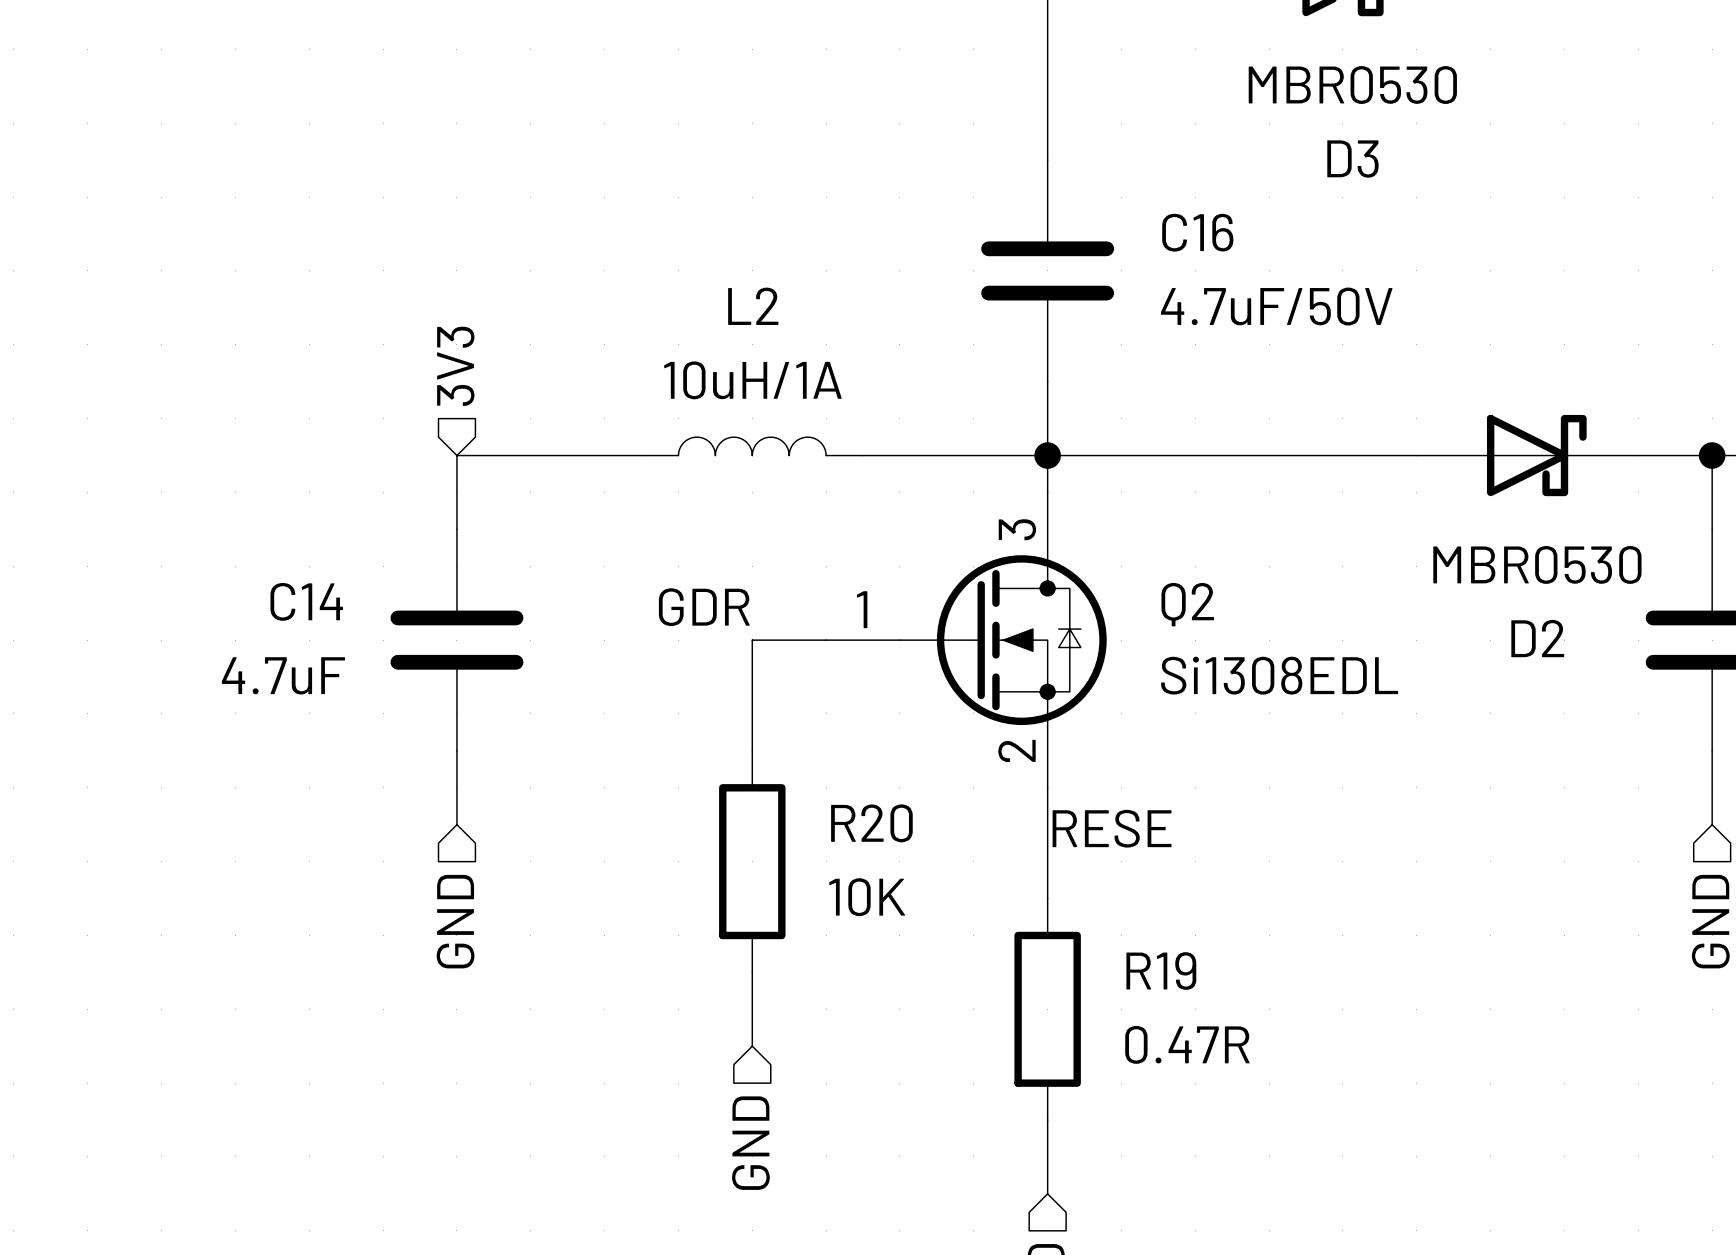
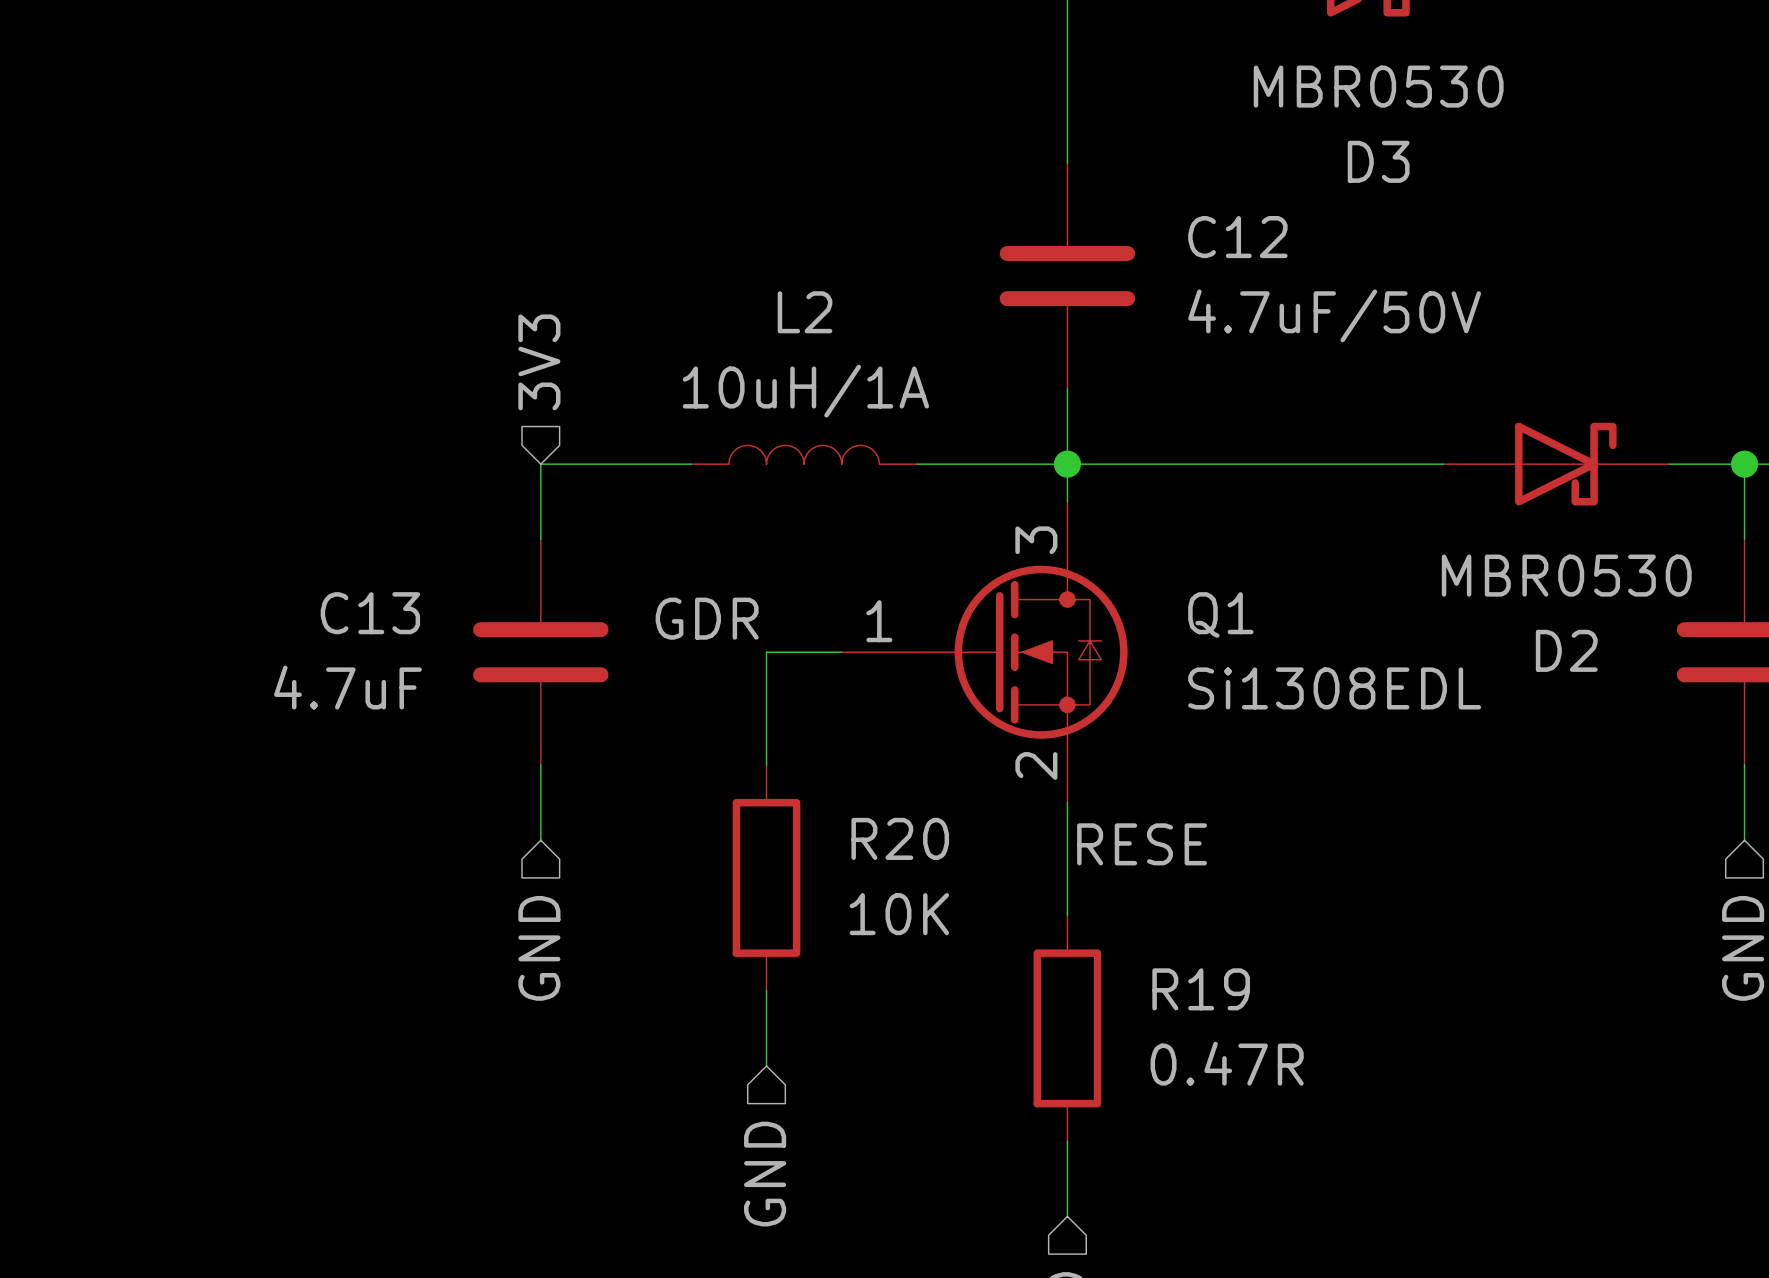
C16 name: C16 (1197, 232) -> C12 (1237, 237)
hierarchical label position: 3V3 (455, 366) -> 3V3 (539, 362)
L2 position: (752, 446) -> (804, 454)
wire: (530, 455) (456, 455) (456, 529) -> (540, 464) (540, 539)
Q2 name: Q2 (1187, 604) -> Q1 (1220, 614)
C14: 4.7uF (456, 640) -> none
C13: none -> 4.7uF (540, 652)
wire: (456, 750) (456, 824) -> (540, 765) (540, 840)
hierarchical label position: GND (455, 921) -> GND (539, 948)

